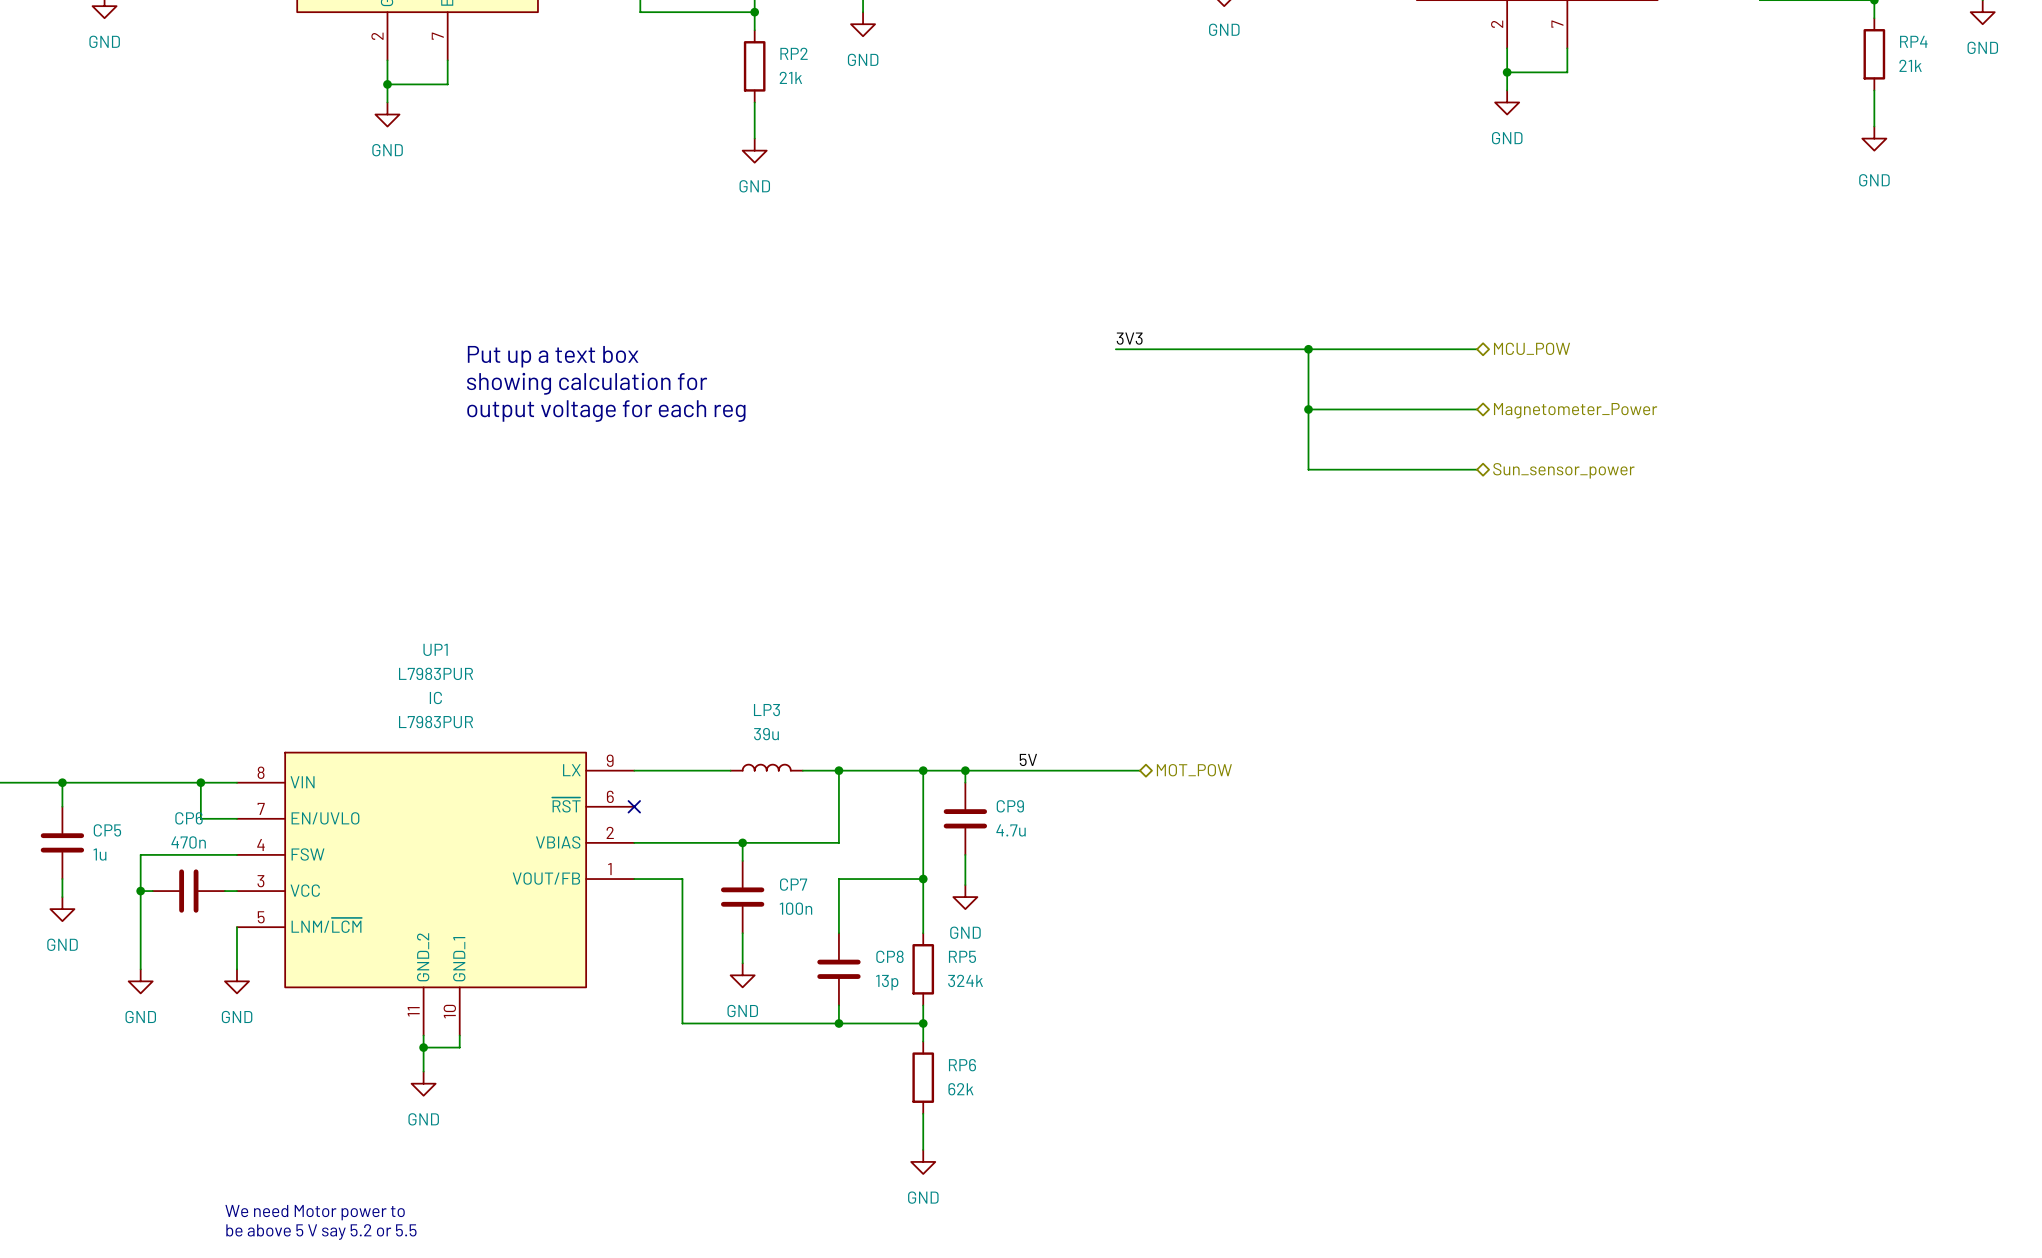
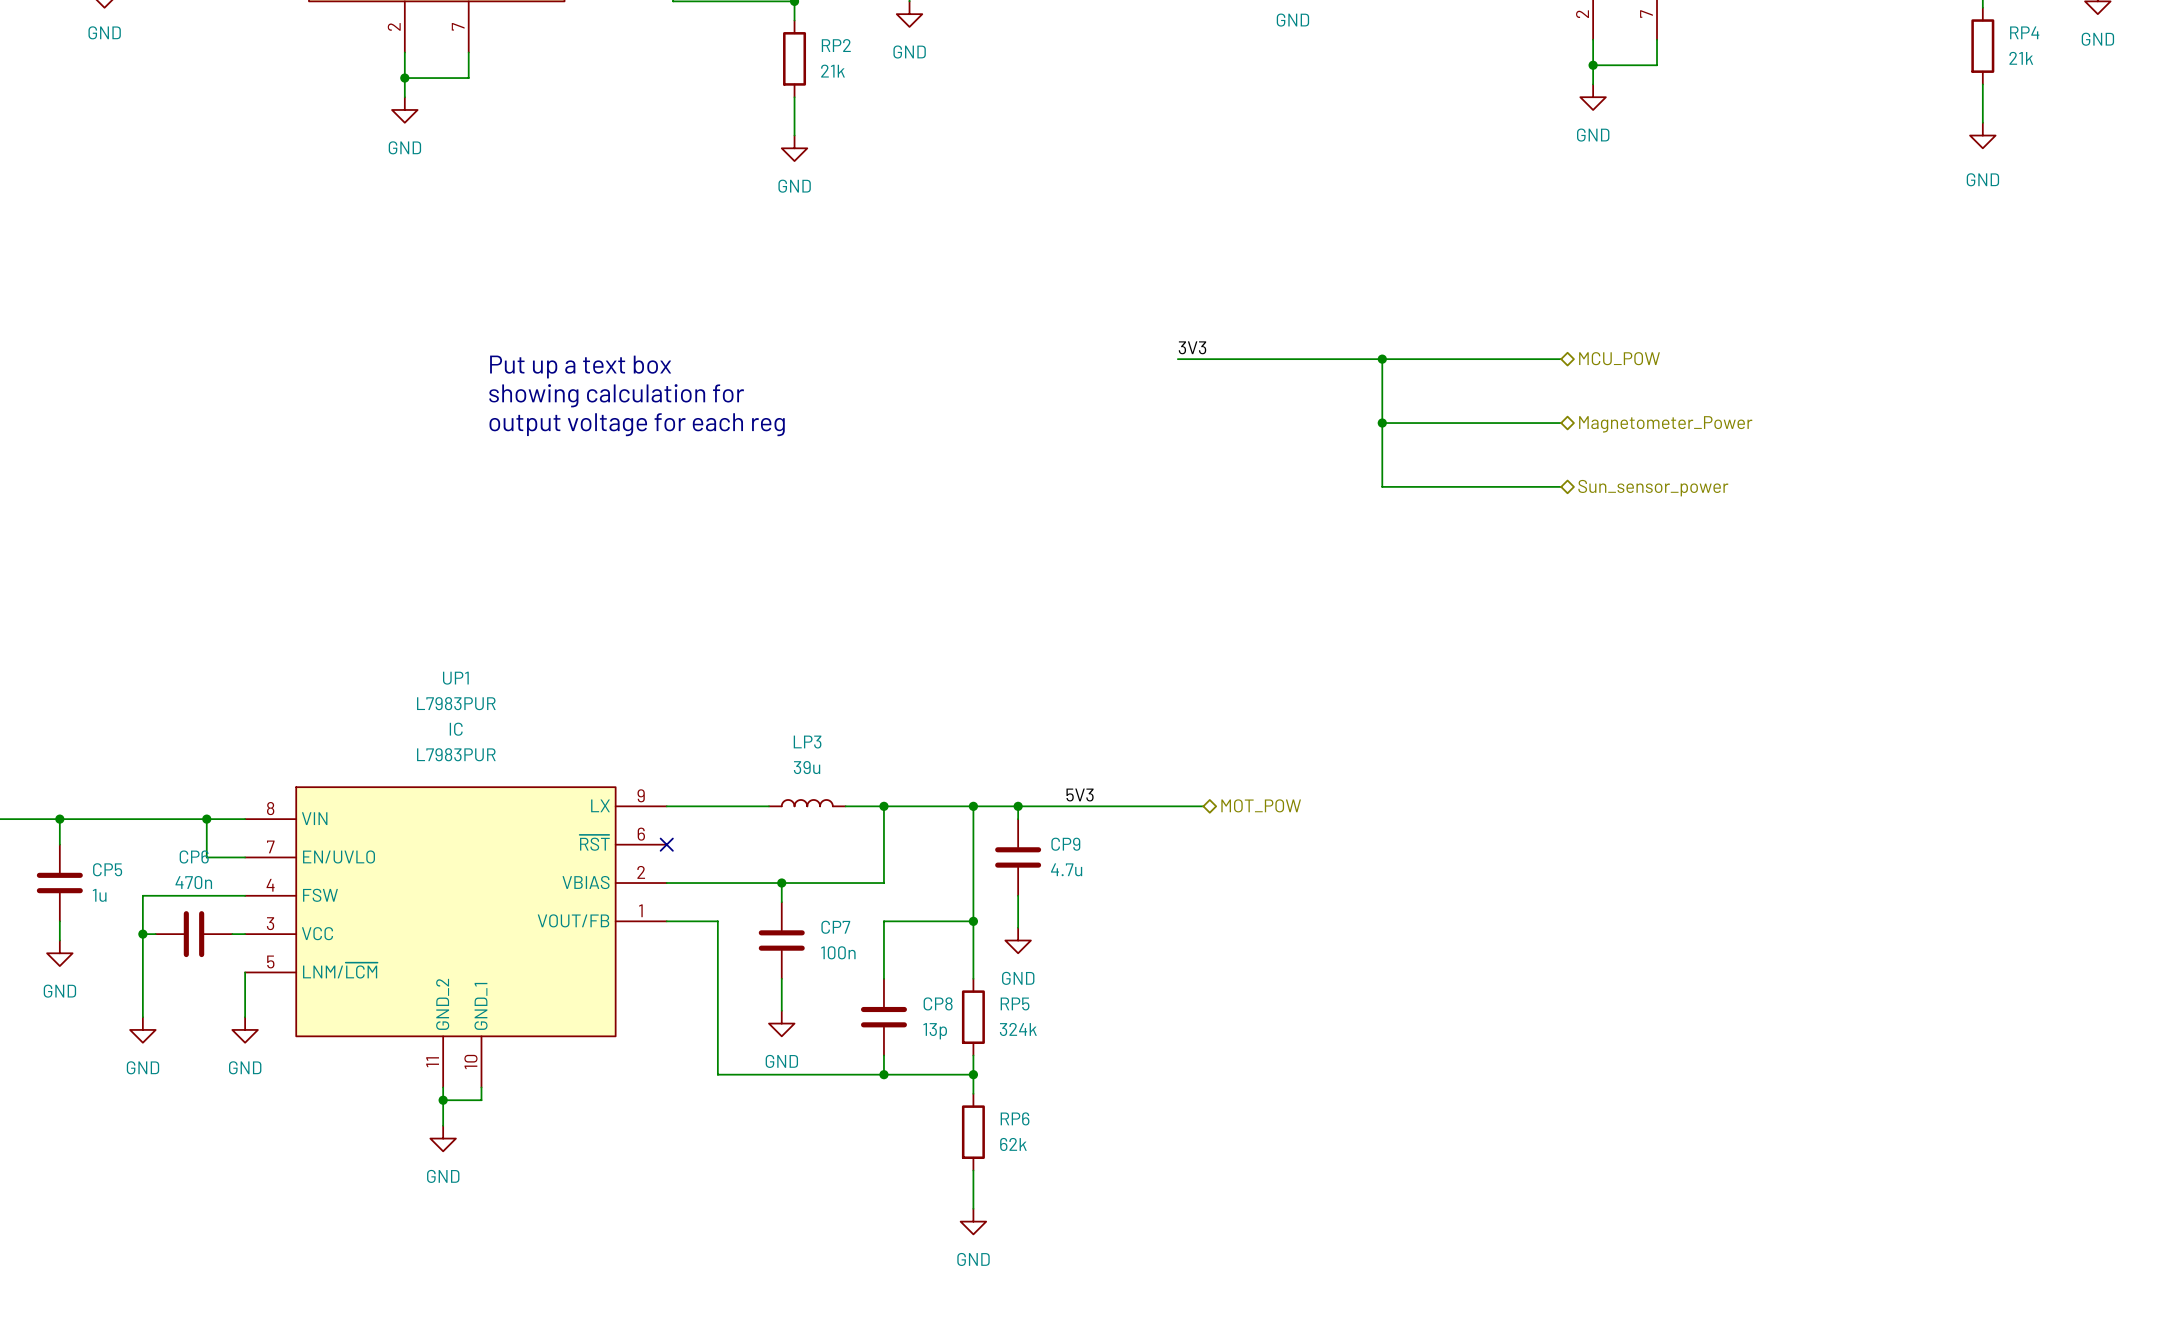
label: 5V (1028, 759) -> 5V3 (1080, 795)
text: We need Motor power to (315, 1212) -> none
text: be above 5 V say 5.2 or 5.5 (321, 1231) -> none

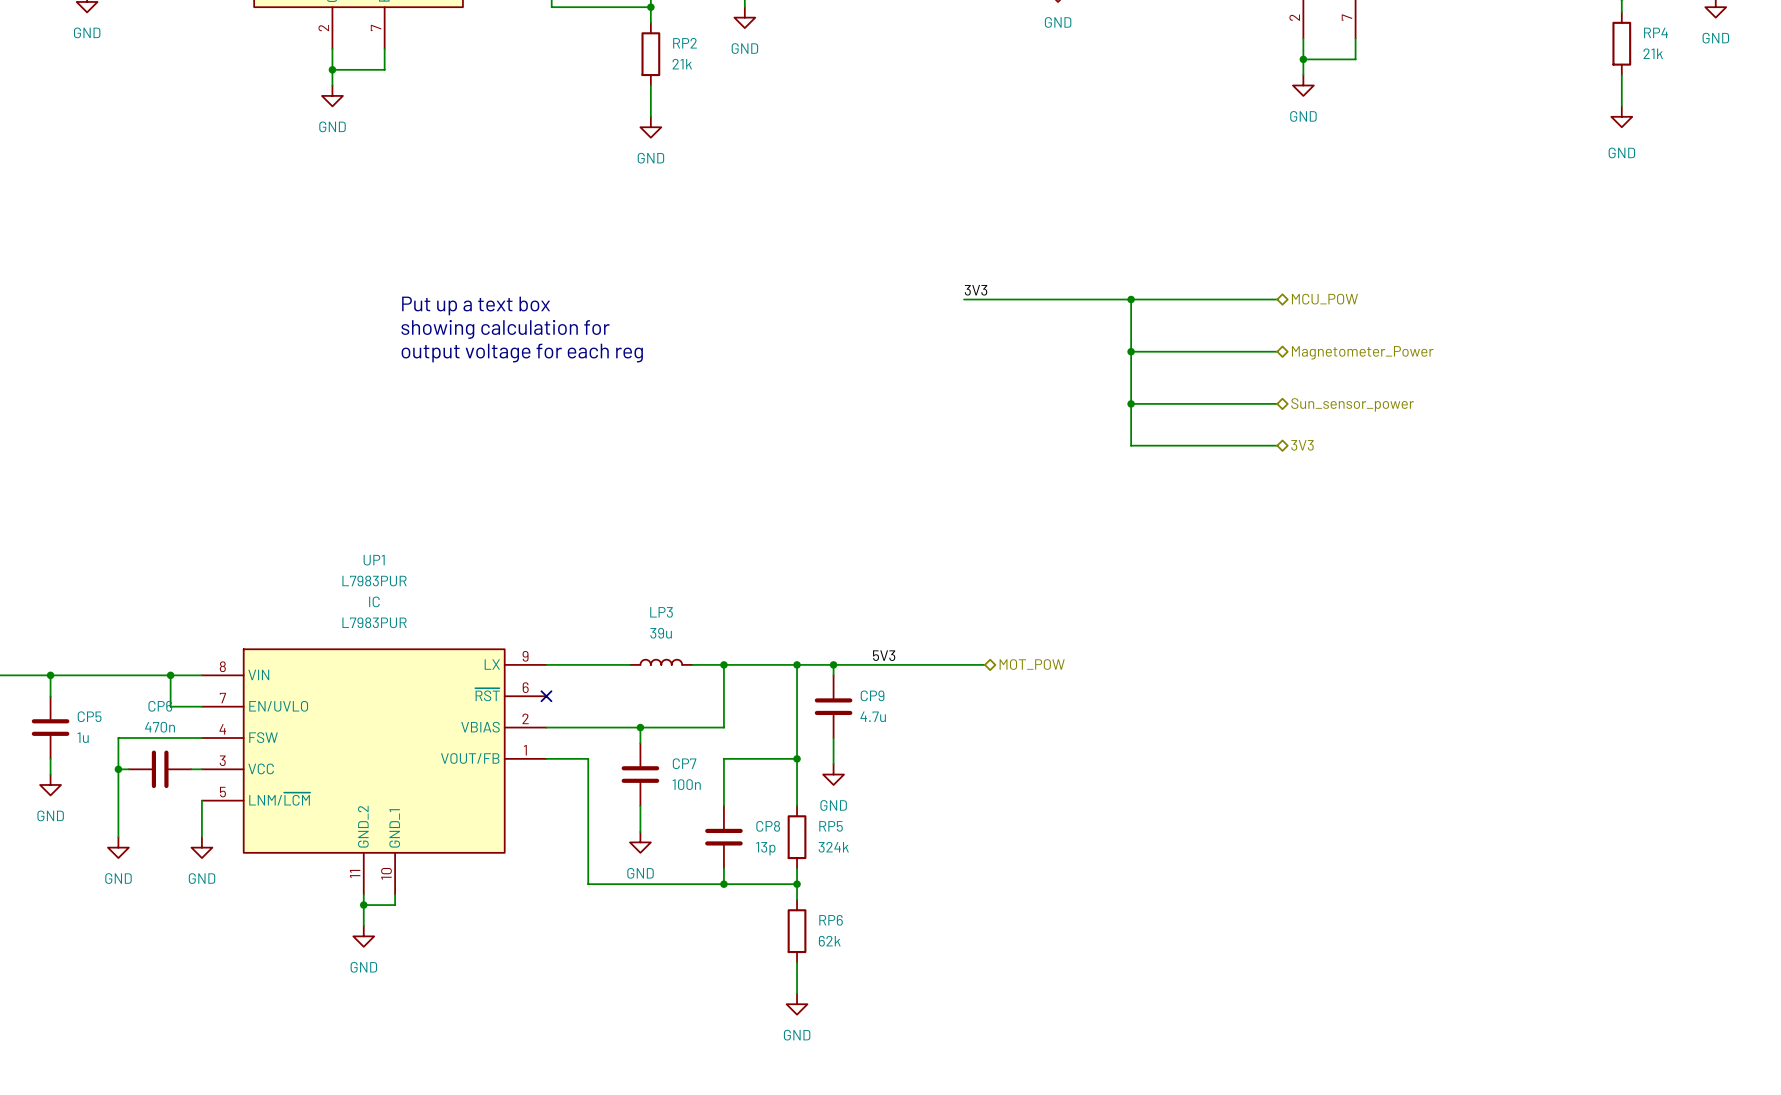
wire: none -> (1131, 403) (1131, 445) (1277, 445)
junction: none -> (1131, 403)
hierarchical label: none -> 3V3 (1302, 445)

